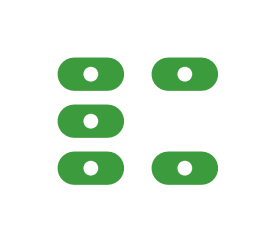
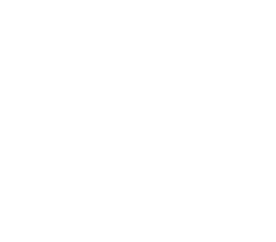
part: (137, 121) -> none

